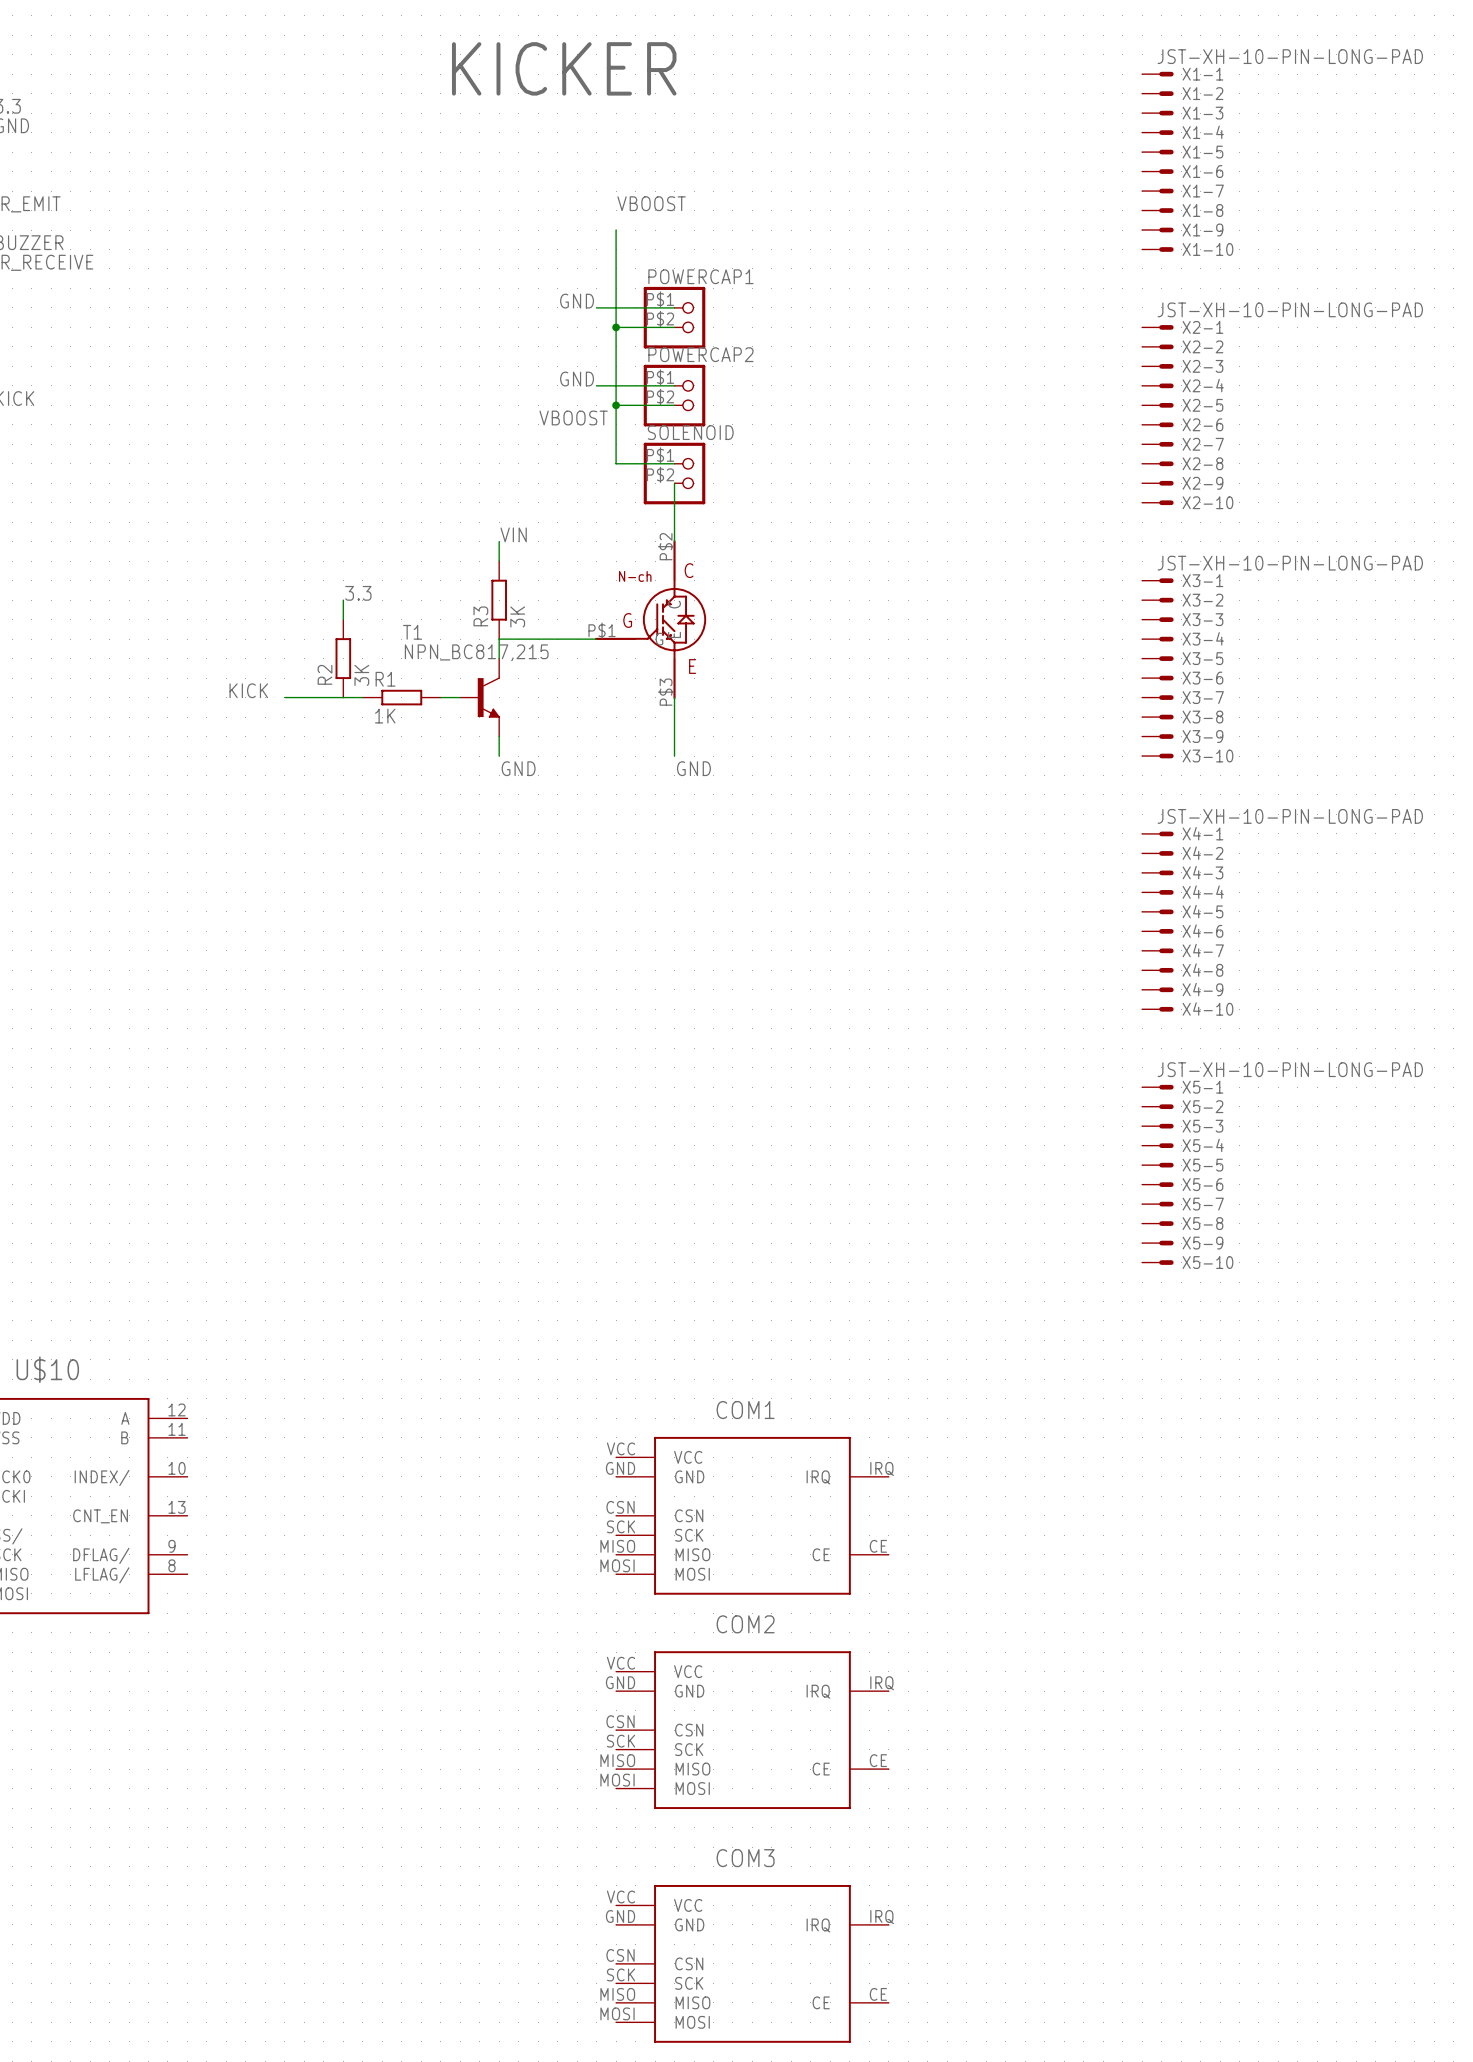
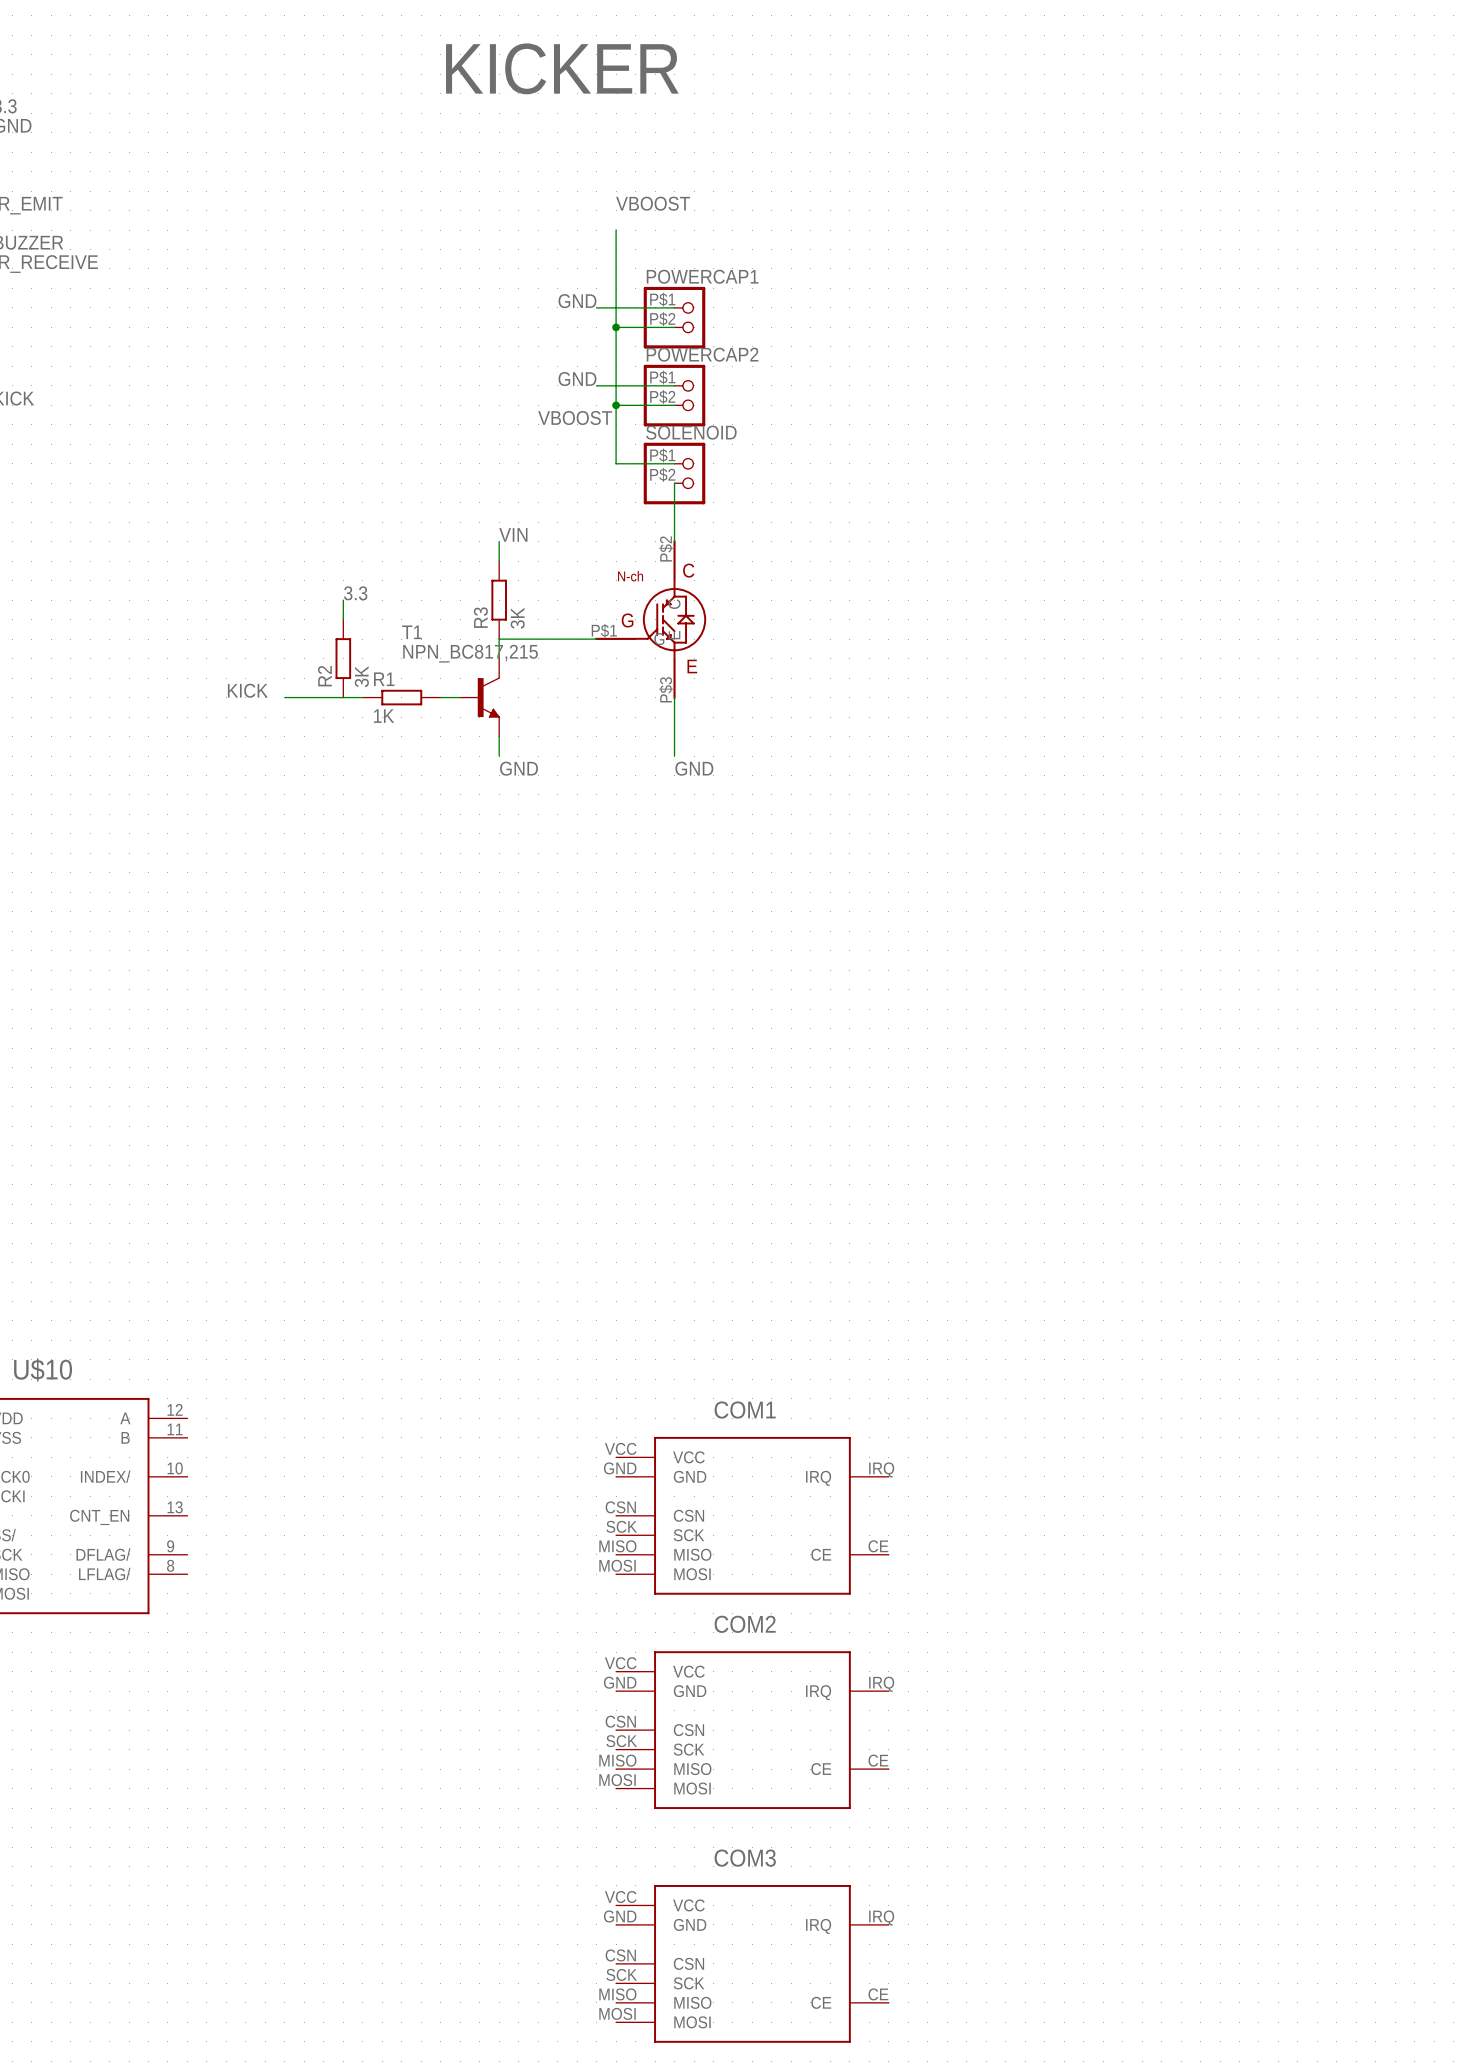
X1-1: JST-XH-10-PIN-LONG-PAD (1157, 74) -> none
X1-2: (1157, 93) -> none
X1-3: (1157, 113) -> none
X1-4: (1157, 132) -> none
X1-5: (1157, 152) -> none
X1-6: (1157, 171) -> none
X1-7: (1157, 191) -> none
X1-8: (1157, 210) -> none
X1-9: (1157, 230) -> none
X1-10: (1157, 249) -> none
X2-1: JST-XH-10-PIN-LONG-PAD (1157, 327) -> none
X2-2: (1157, 346) -> none
X2-3: (1157, 366) -> none
X2-4: (1157, 385) -> none
X2-5: (1157, 405) -> none
X2-6: (1157, 424) -> none
X2-7: (1157, 444) -> none
X2-8: (1157, 463) -> none
X2-9: (1157, 483) -> none
X2-10: (1157, 502) -> none
X3-1: JST-XH-10-PIN-LONG-PAD (1157, 580) -> none
X3-2: (1157, 600) -> none
X3-3: (1157, 619) -> none
X3-4: (1157, 639) -> none
X3-5: (1157, 658) -> none
X3-6: (1157, 678) -> none
X3-7: (1157, 697) -> none
X3-8: (1157, 717) -> none
X3-9: (1157, 736) -> none
X3-10: (1157, 756) -> none
X4-1: JST-XH-10-PIN-LONG-PAD (1157, 833) -> none
X4-2: (1157, 853) -> none
X4-3: (1157, 872) -> none
X4-4: (1157, 892) -> none
X4-5: (1157, 911) -> none
X4-6: (1157, 931) -> none
X4-7: (1157, 950) -> none
X4-8: (1157, 970) -> none
X4-9: (1157, 989) -> none
X4-10: (1157, 1009) -> none
X5-1: JST-XH-10-PIN-LONG-PAD (1157, 1087) -> none
X5-2: (1157, 1106) -> none
X5-3: (1157, 1126) -> none
X5-4: (1157, 1145) -> none
X5-5: (1157, 1165) -> none
X5-6: (1157, 1184) -> none
X5-7: (1157, 1204) -> none
X5-8: (1157, 1223) -> none
X5-9: (1157, 1243) -> none
X5-10: (1157, 1262) -> none

